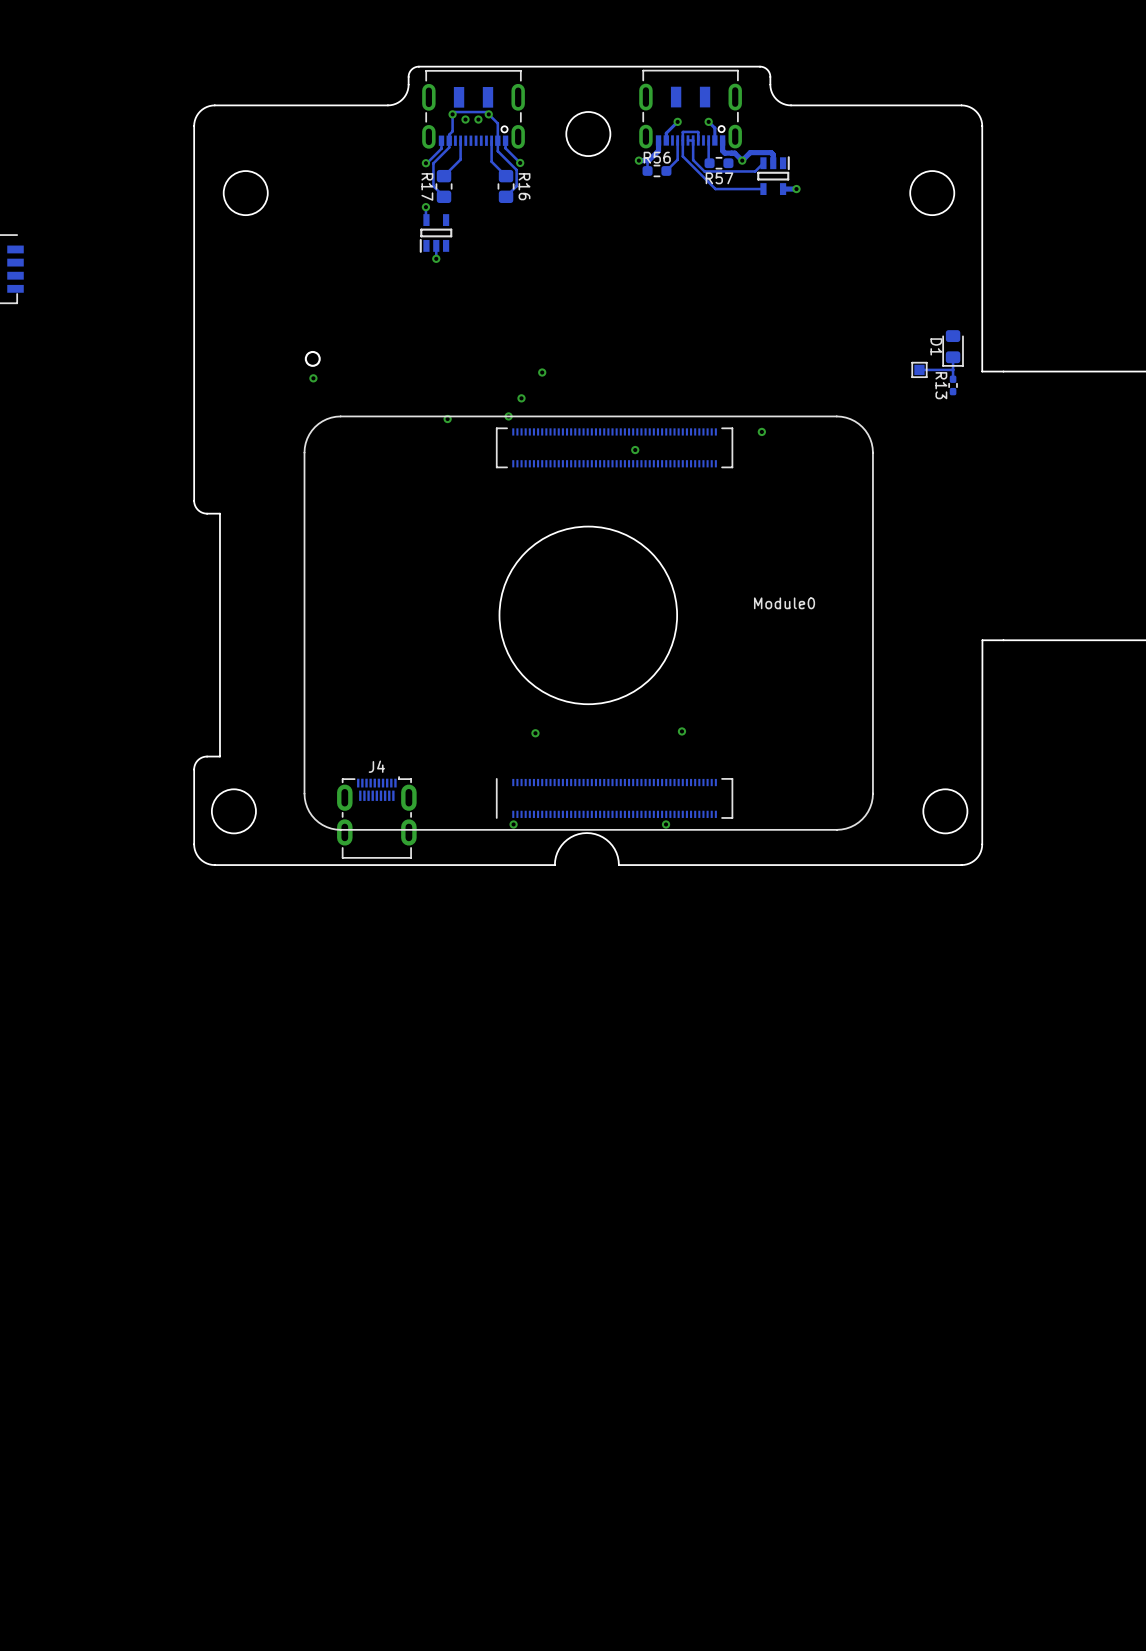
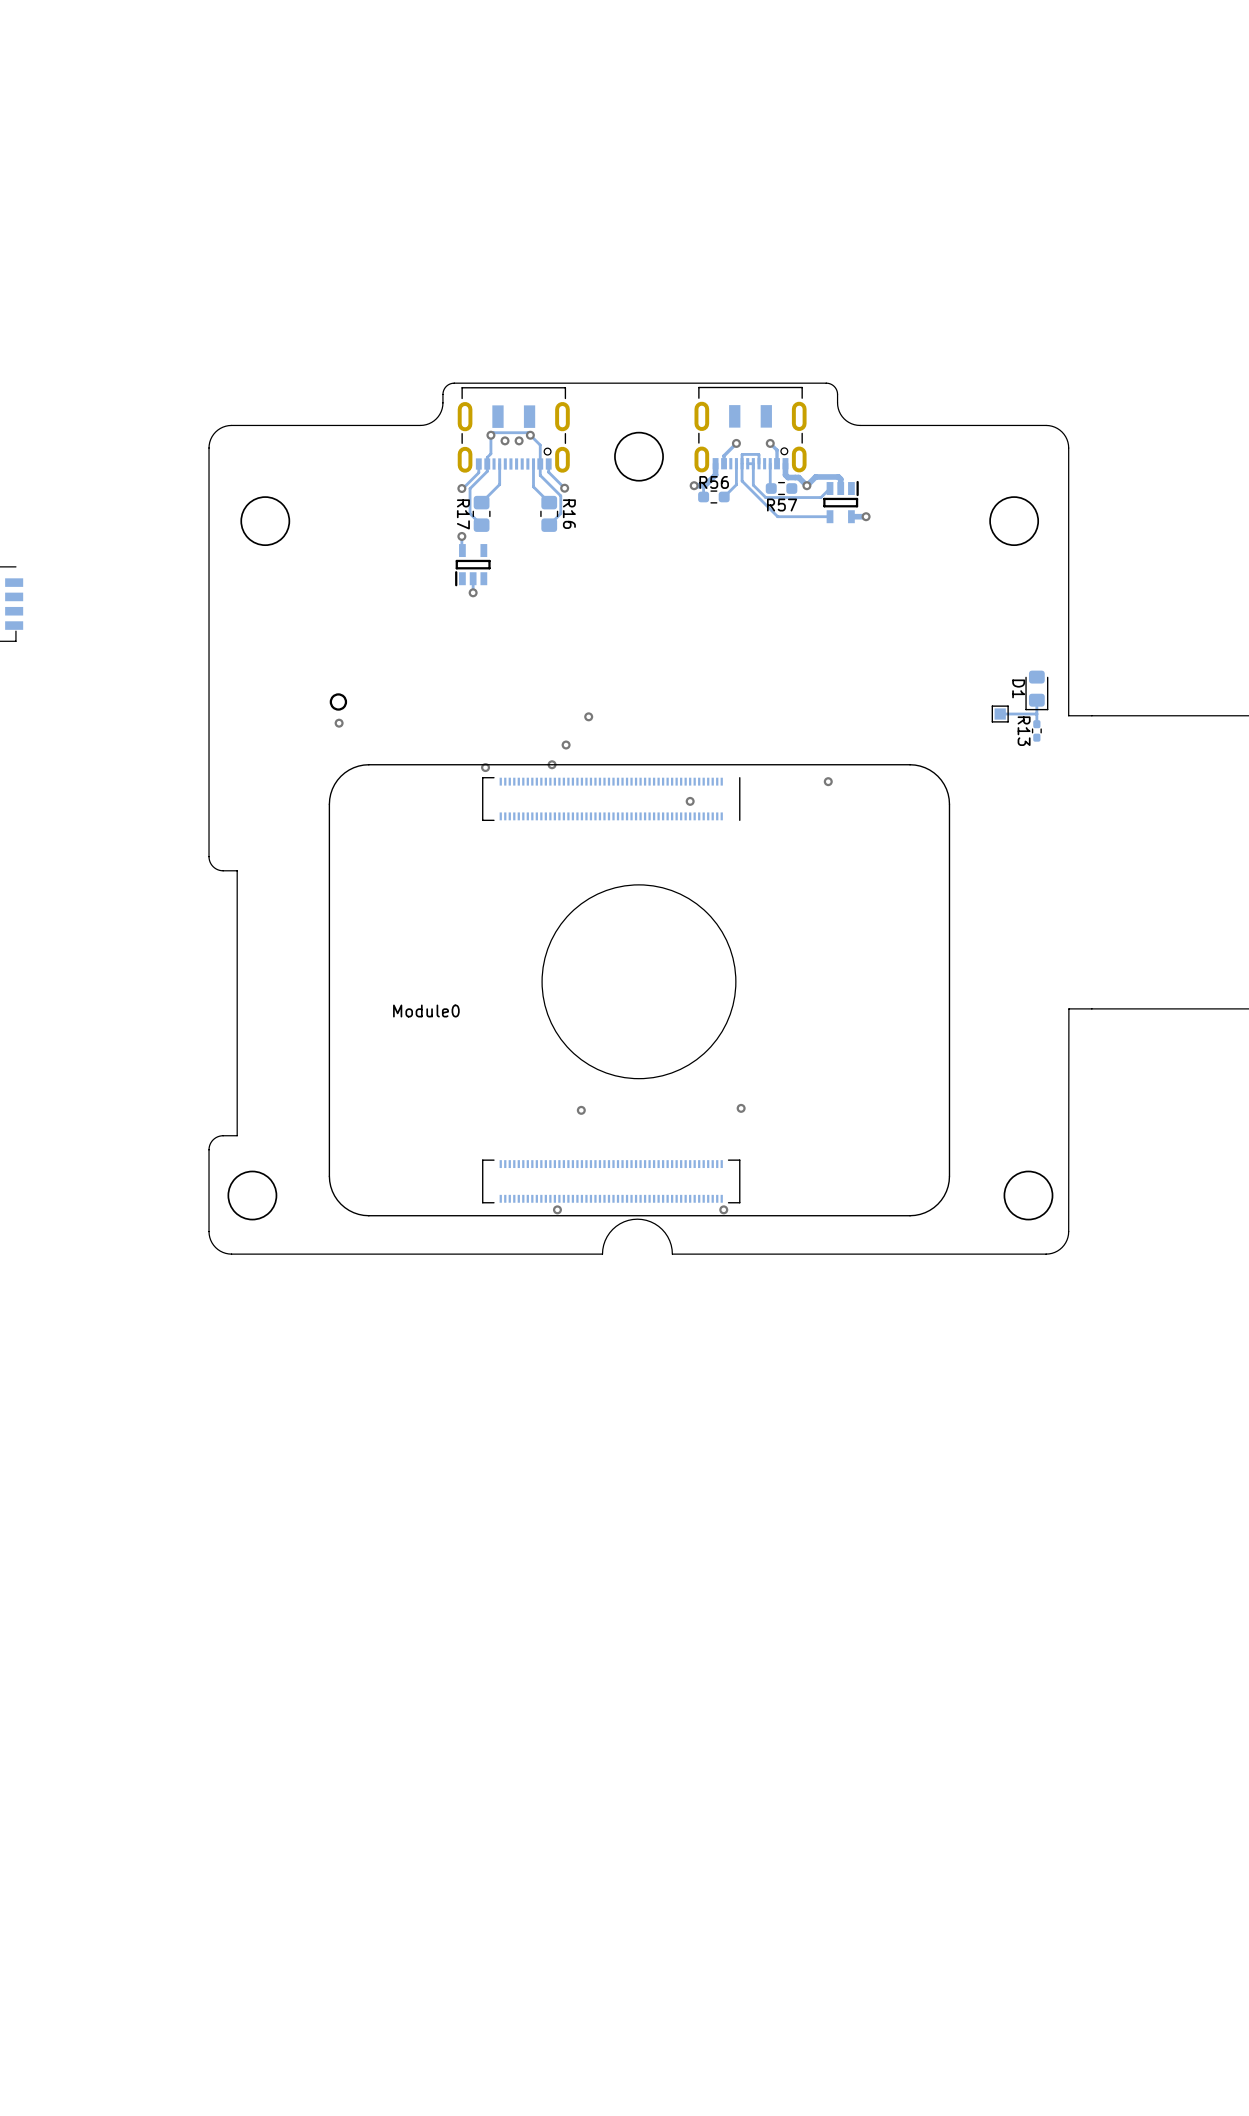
Module0 rotation: 0° (588, 623) -> 180° (639, 990)
J4: (376, 817) -> none

